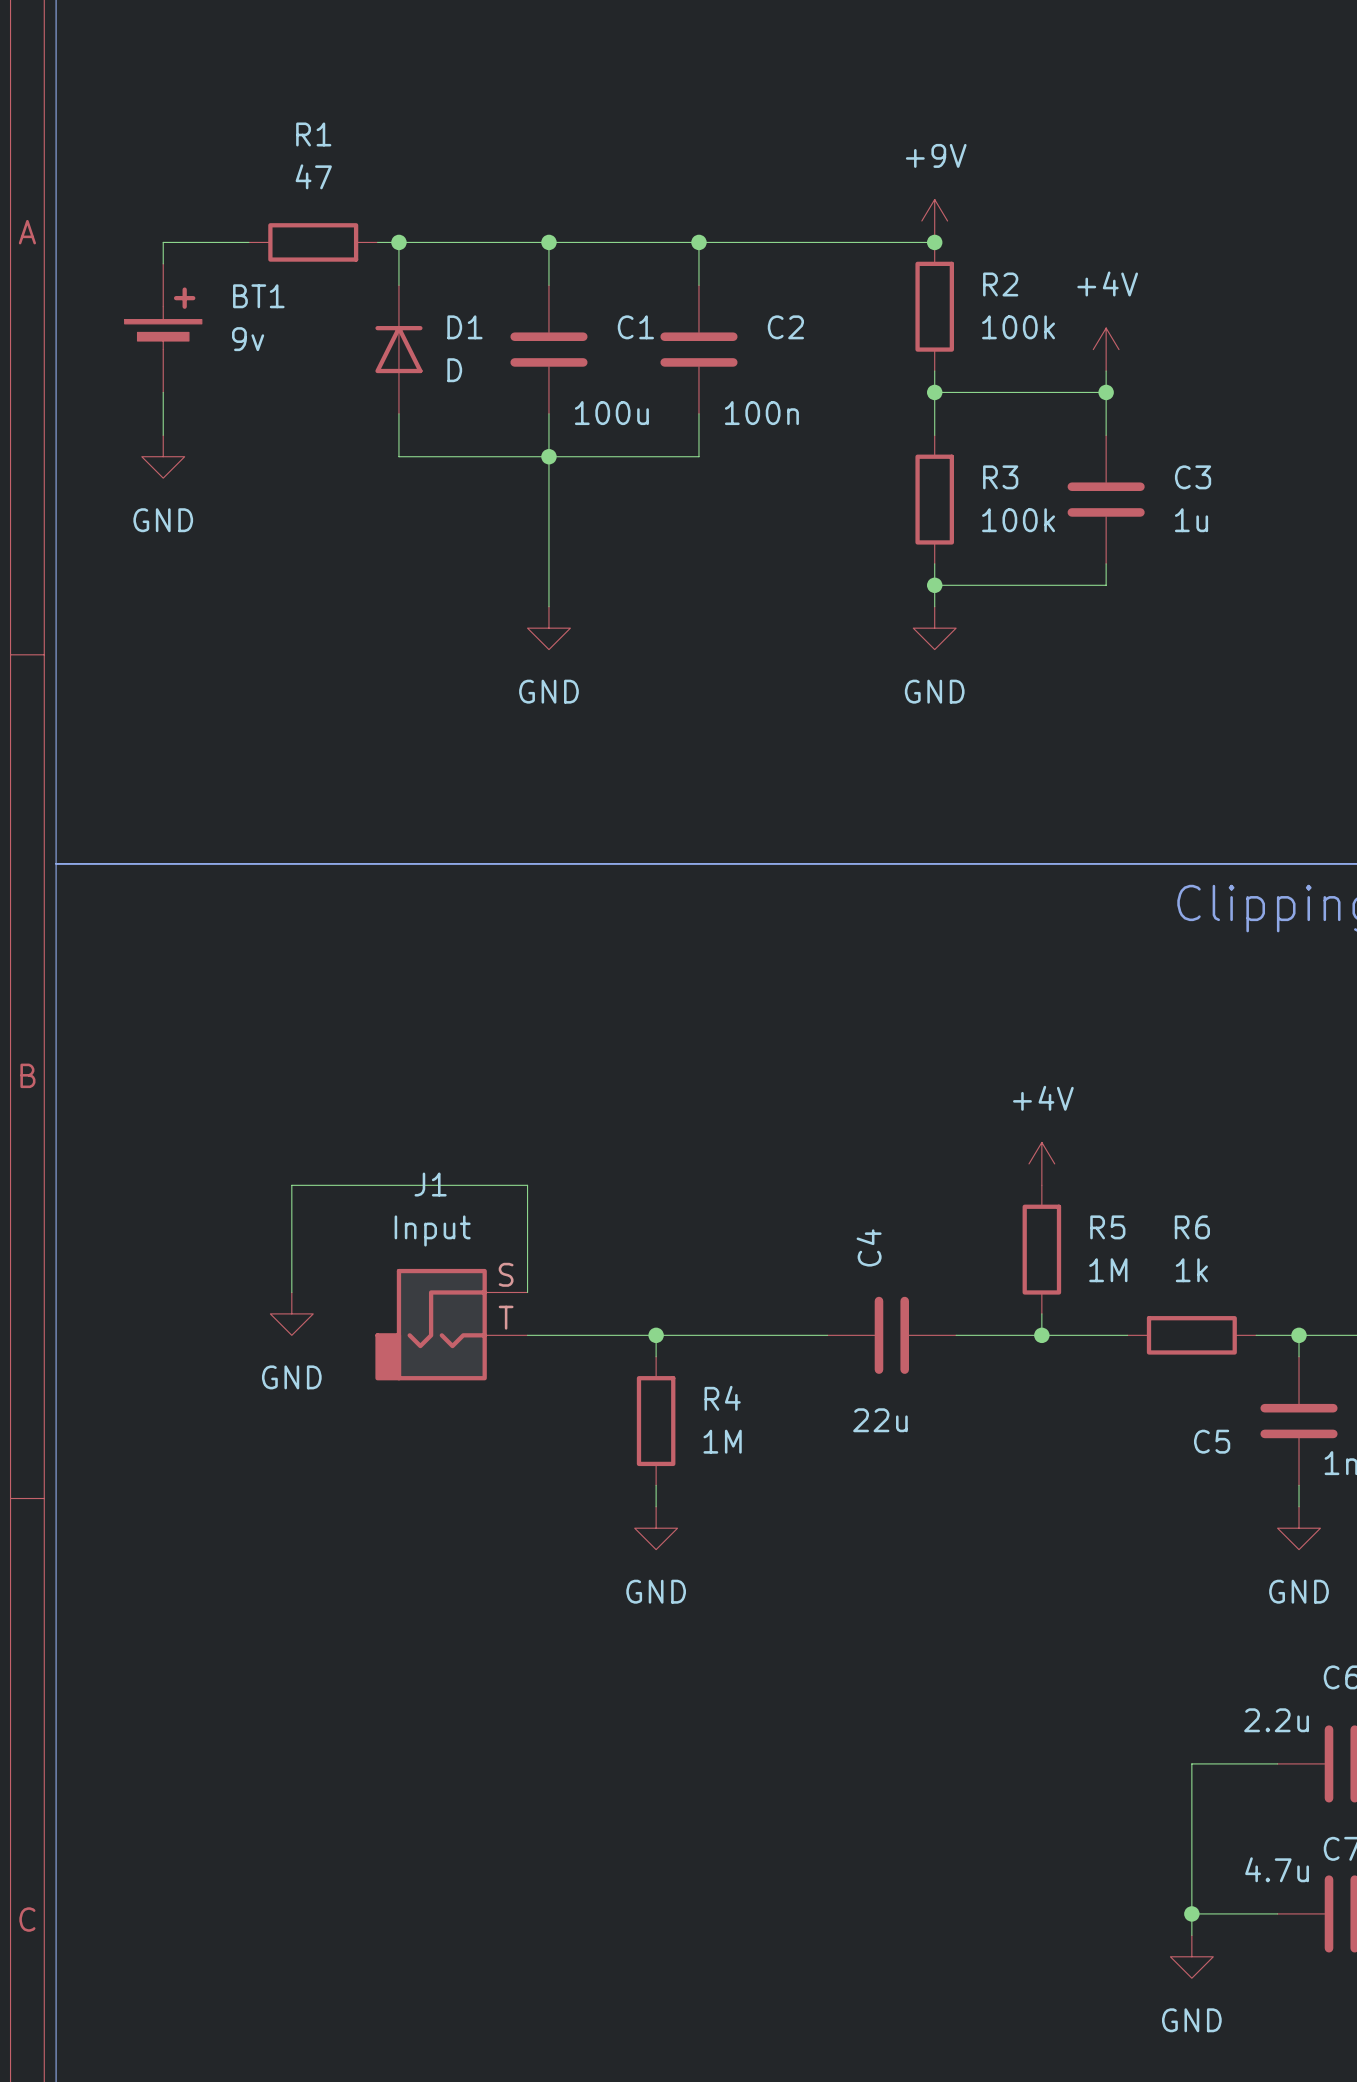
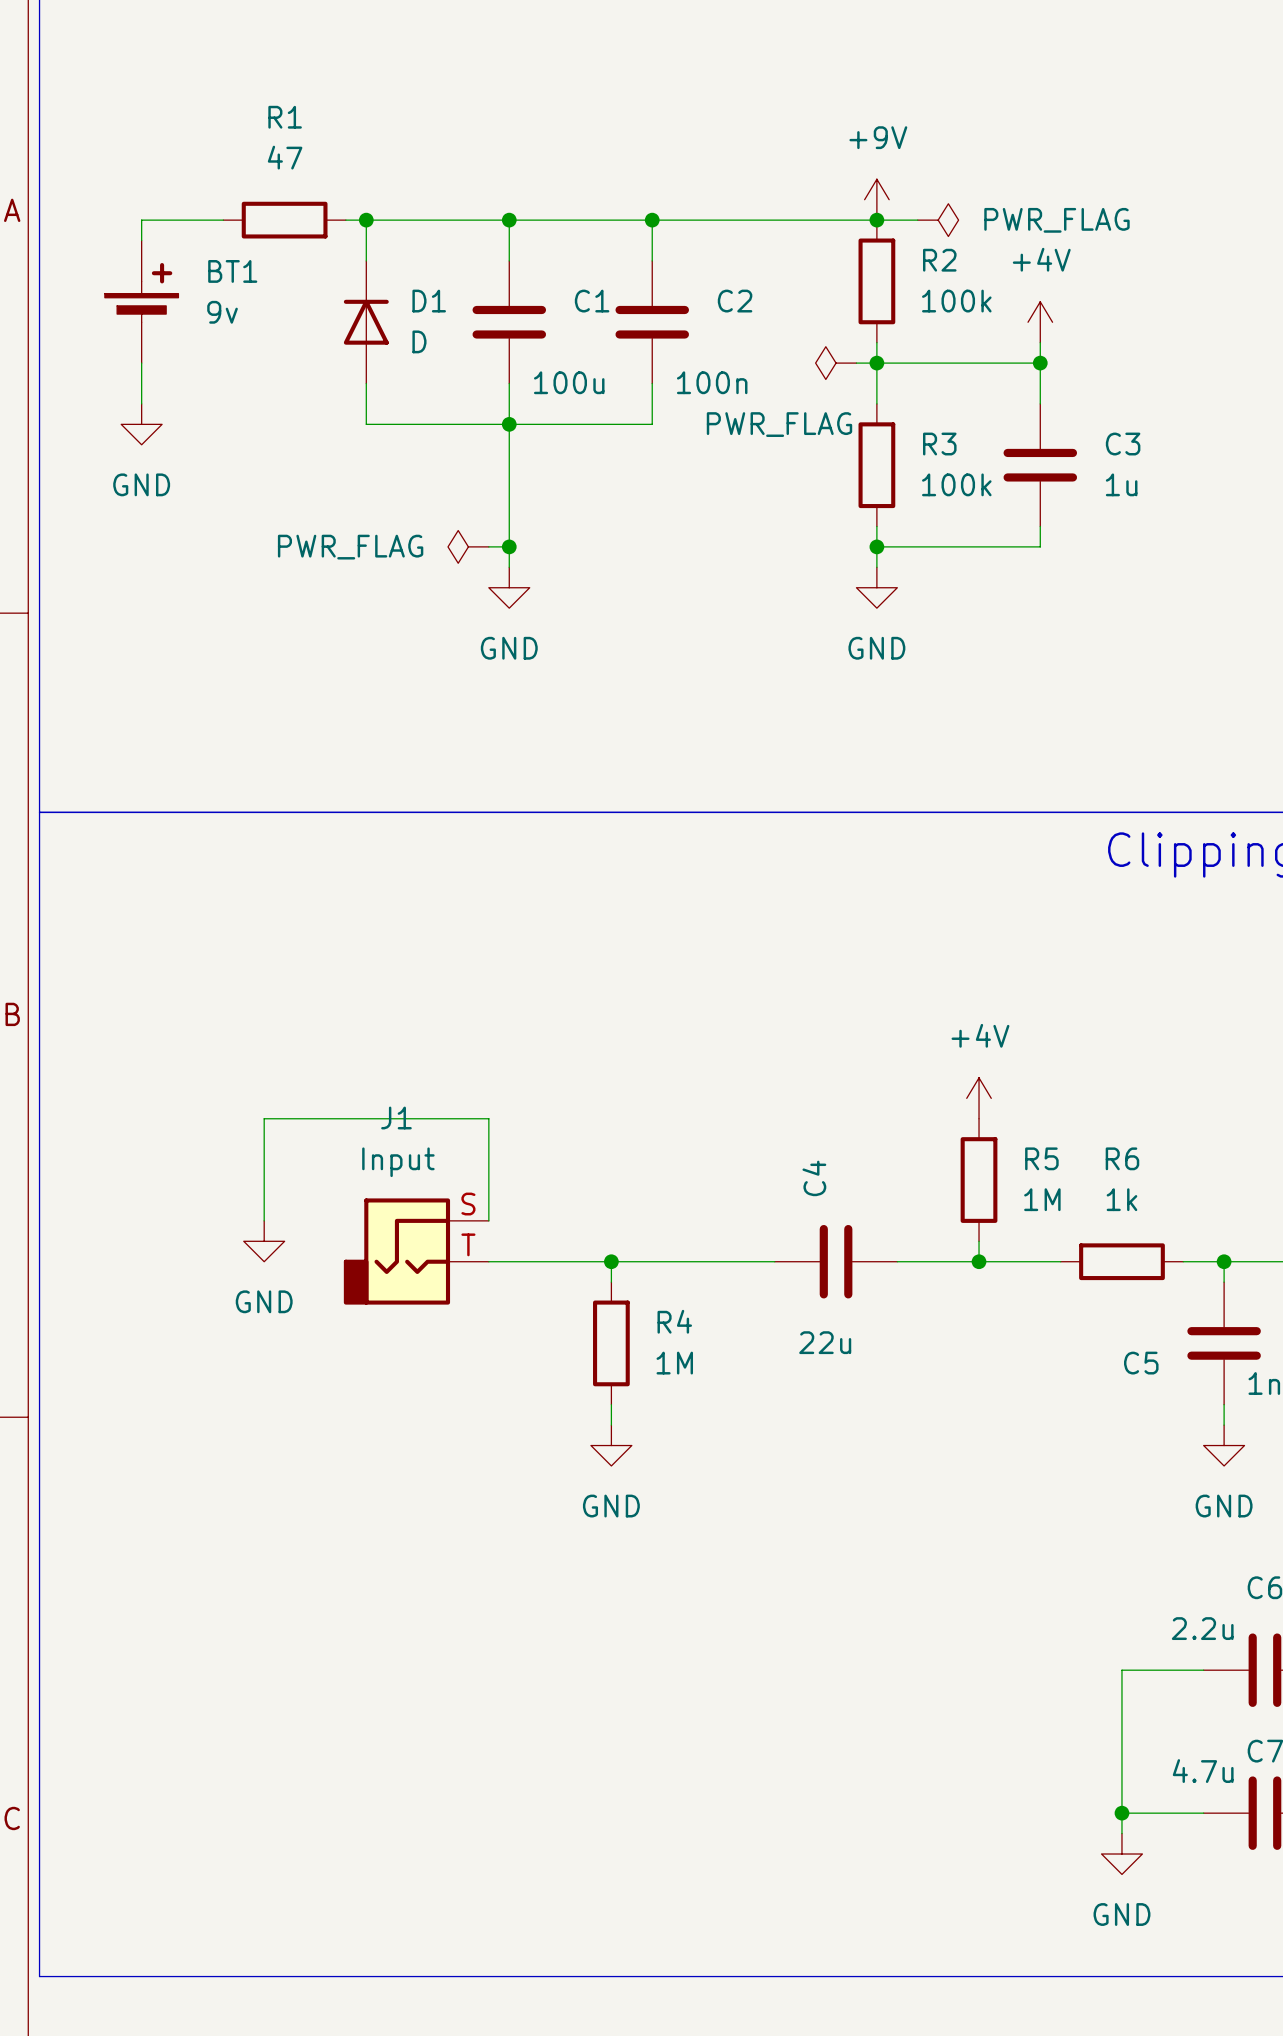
wire: none -> (876, 220) (917, 220)
power symbol: none -> PWR_FLAG (938, 220)
power symbol: none -> PWR_FLAG (836, 363)
wire: none -> (856, 363) (876, 363)
power symbol: none -> PWR_FLAG (468, 546)
wire: none -> (488, 546) (509, 546)
junction: none -> (509, 546)

